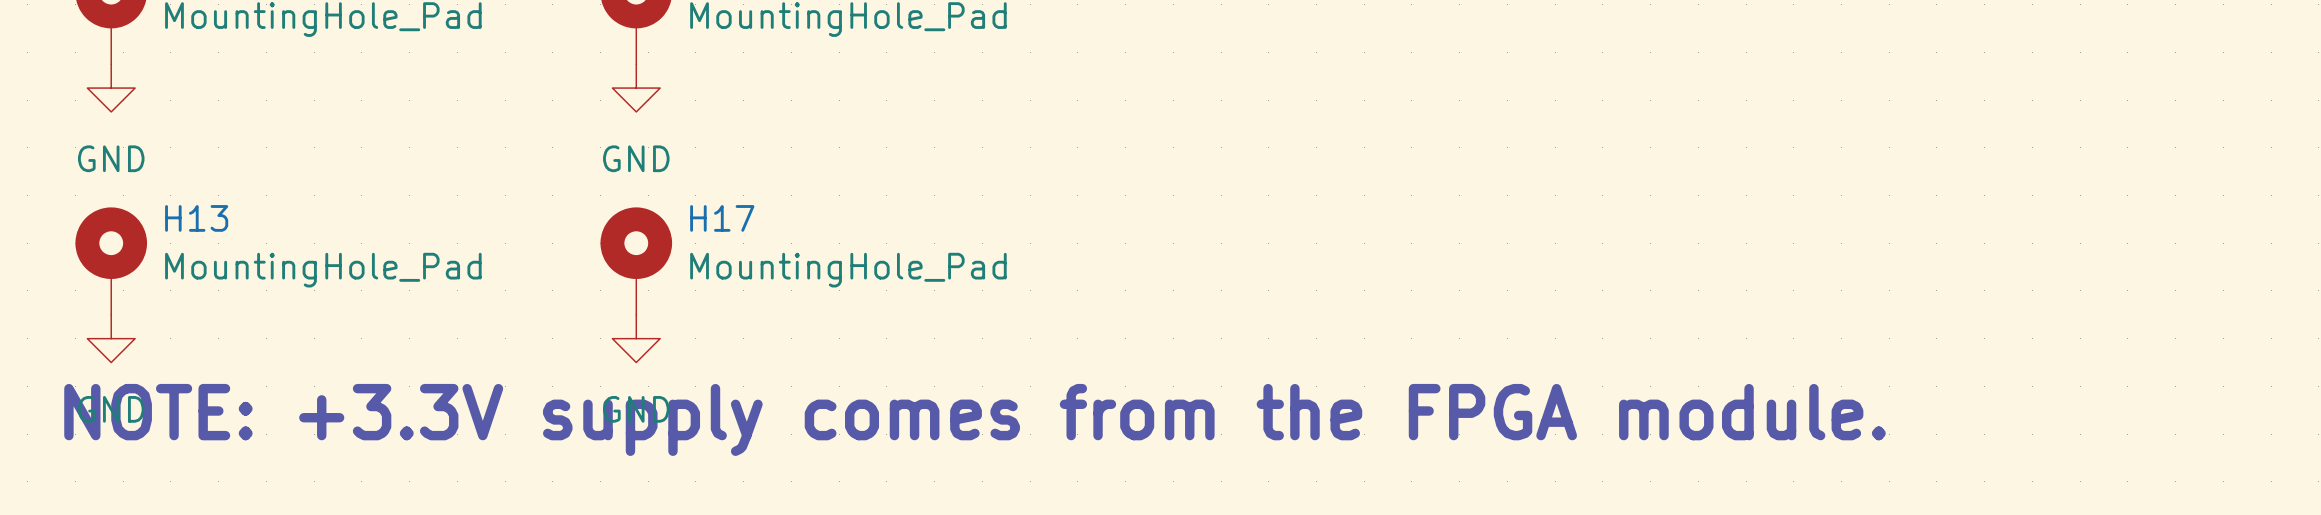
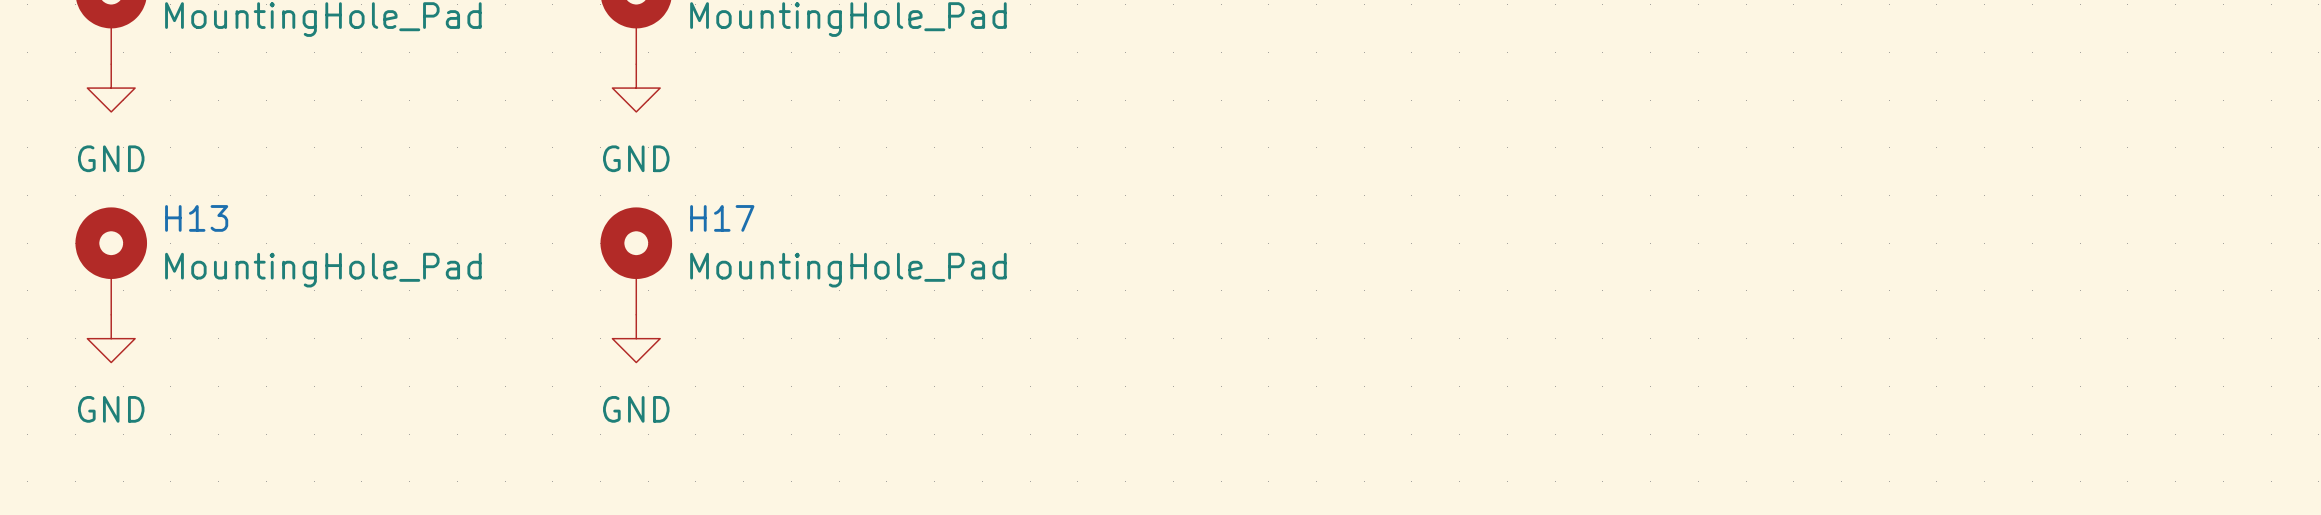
text: NOTE: +3.3V supply comes from the FPGA module. (974, 419) -> none

